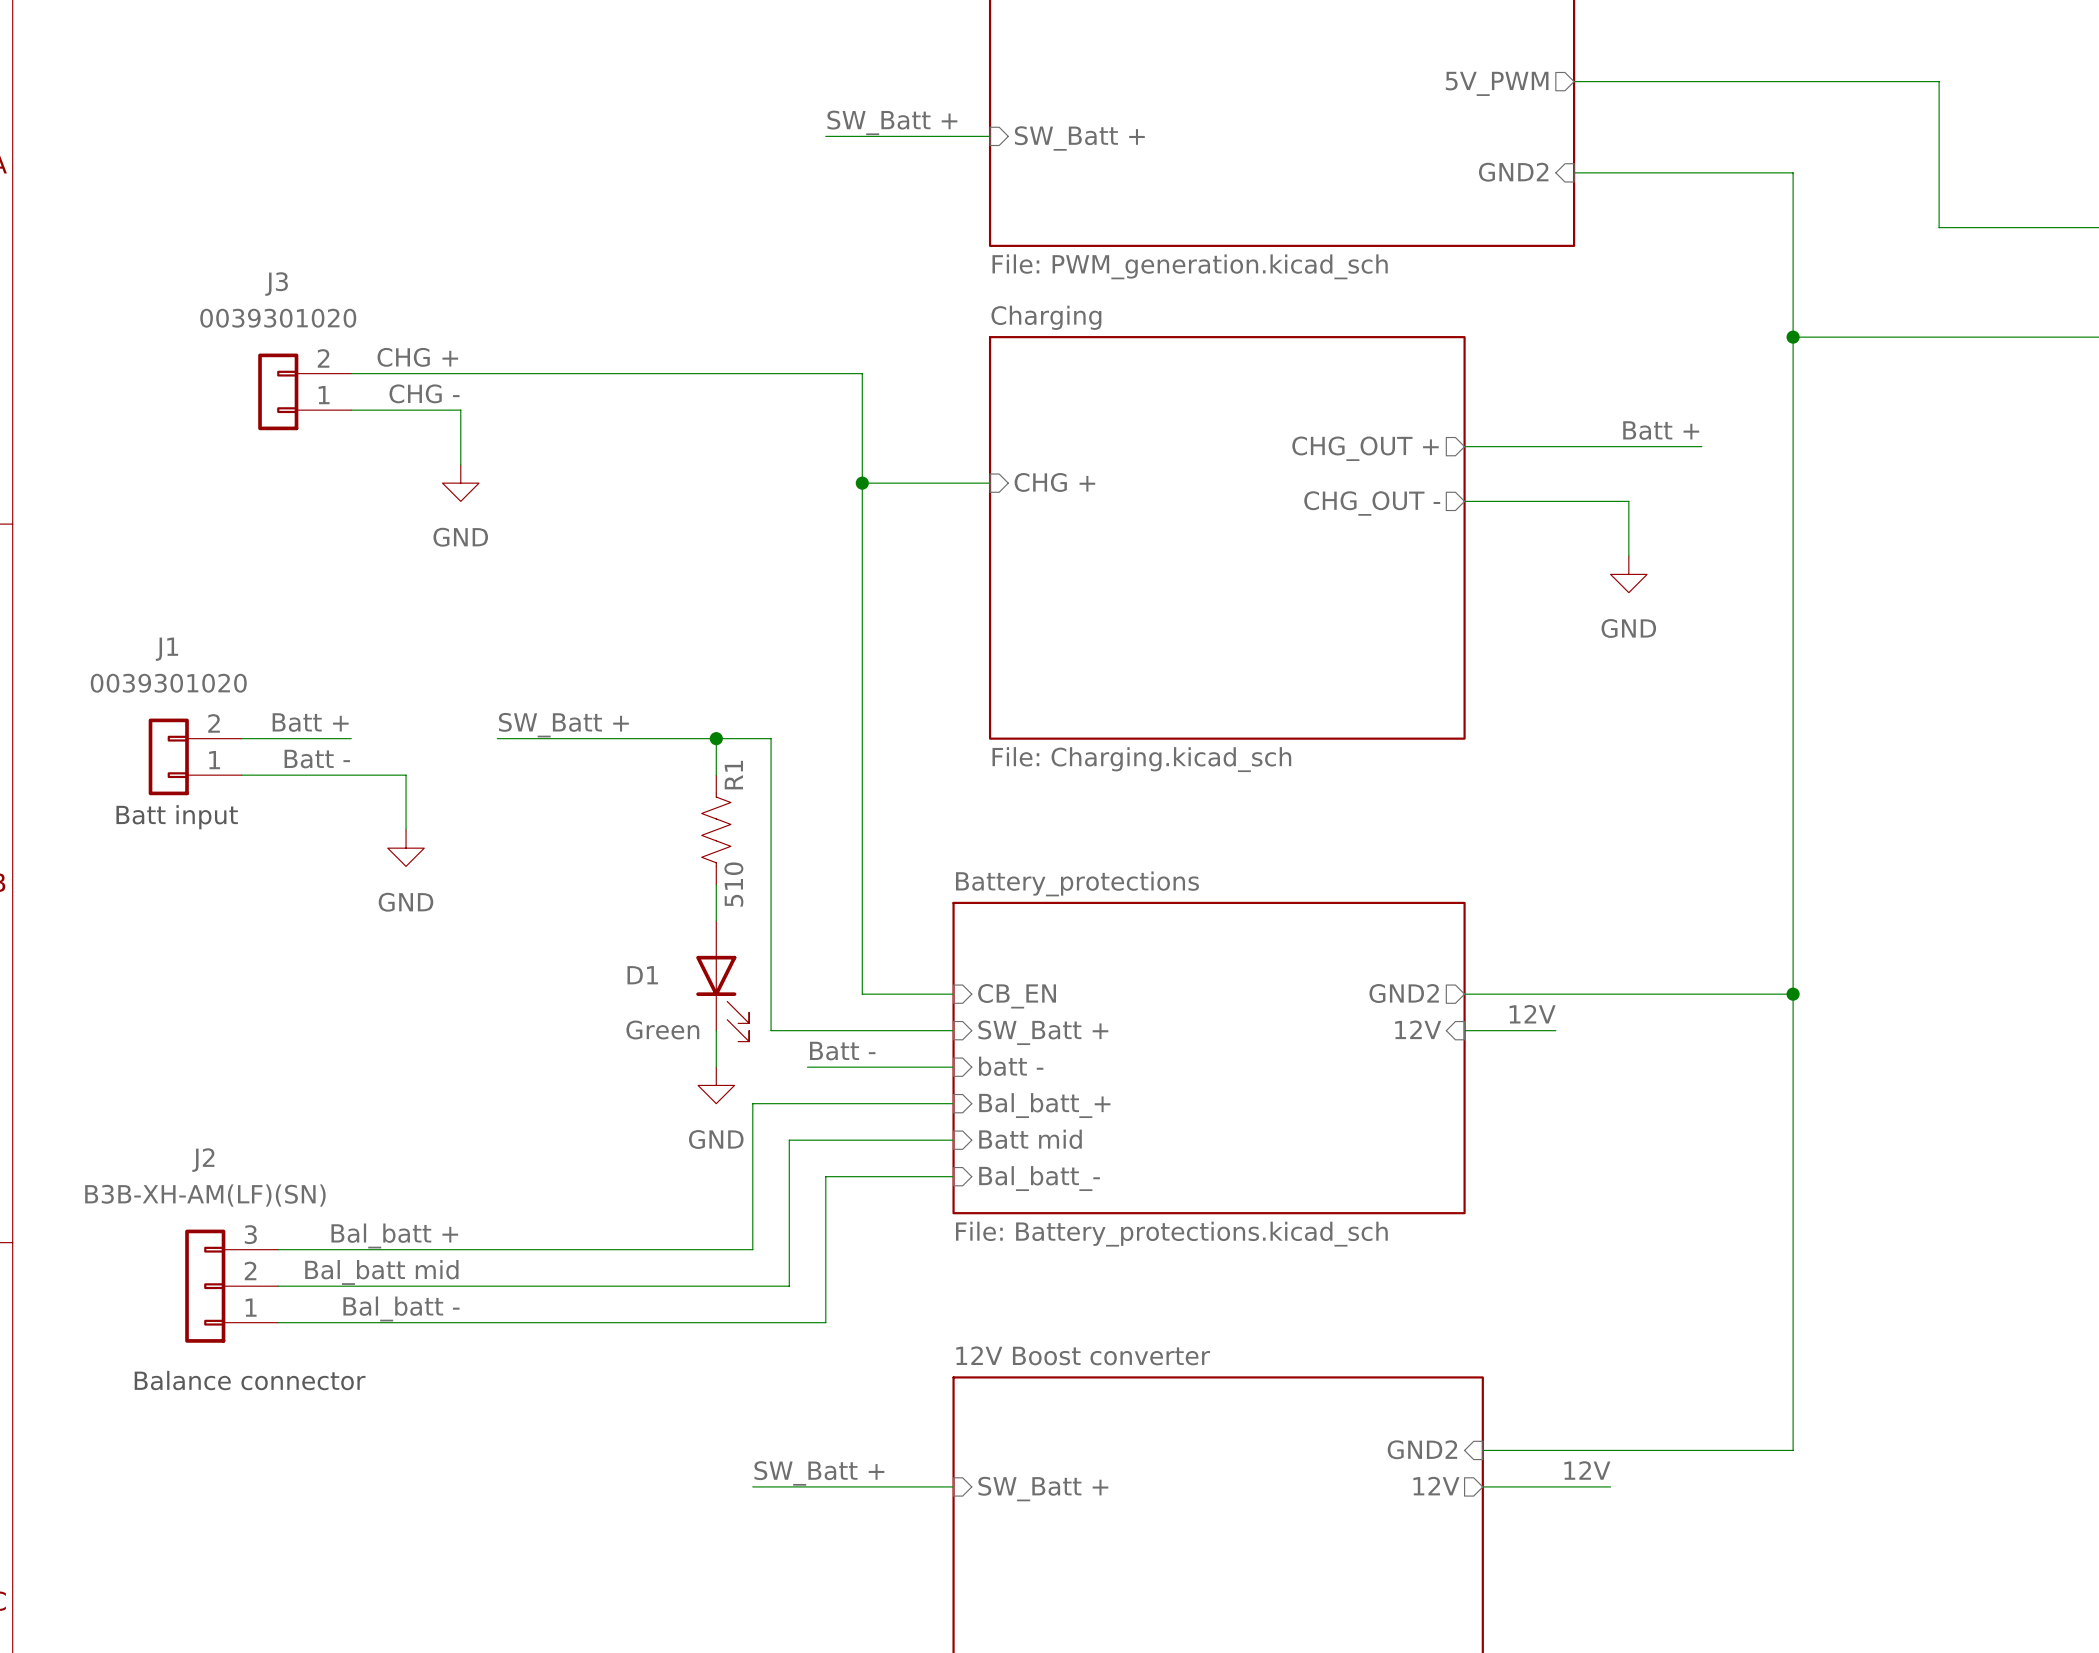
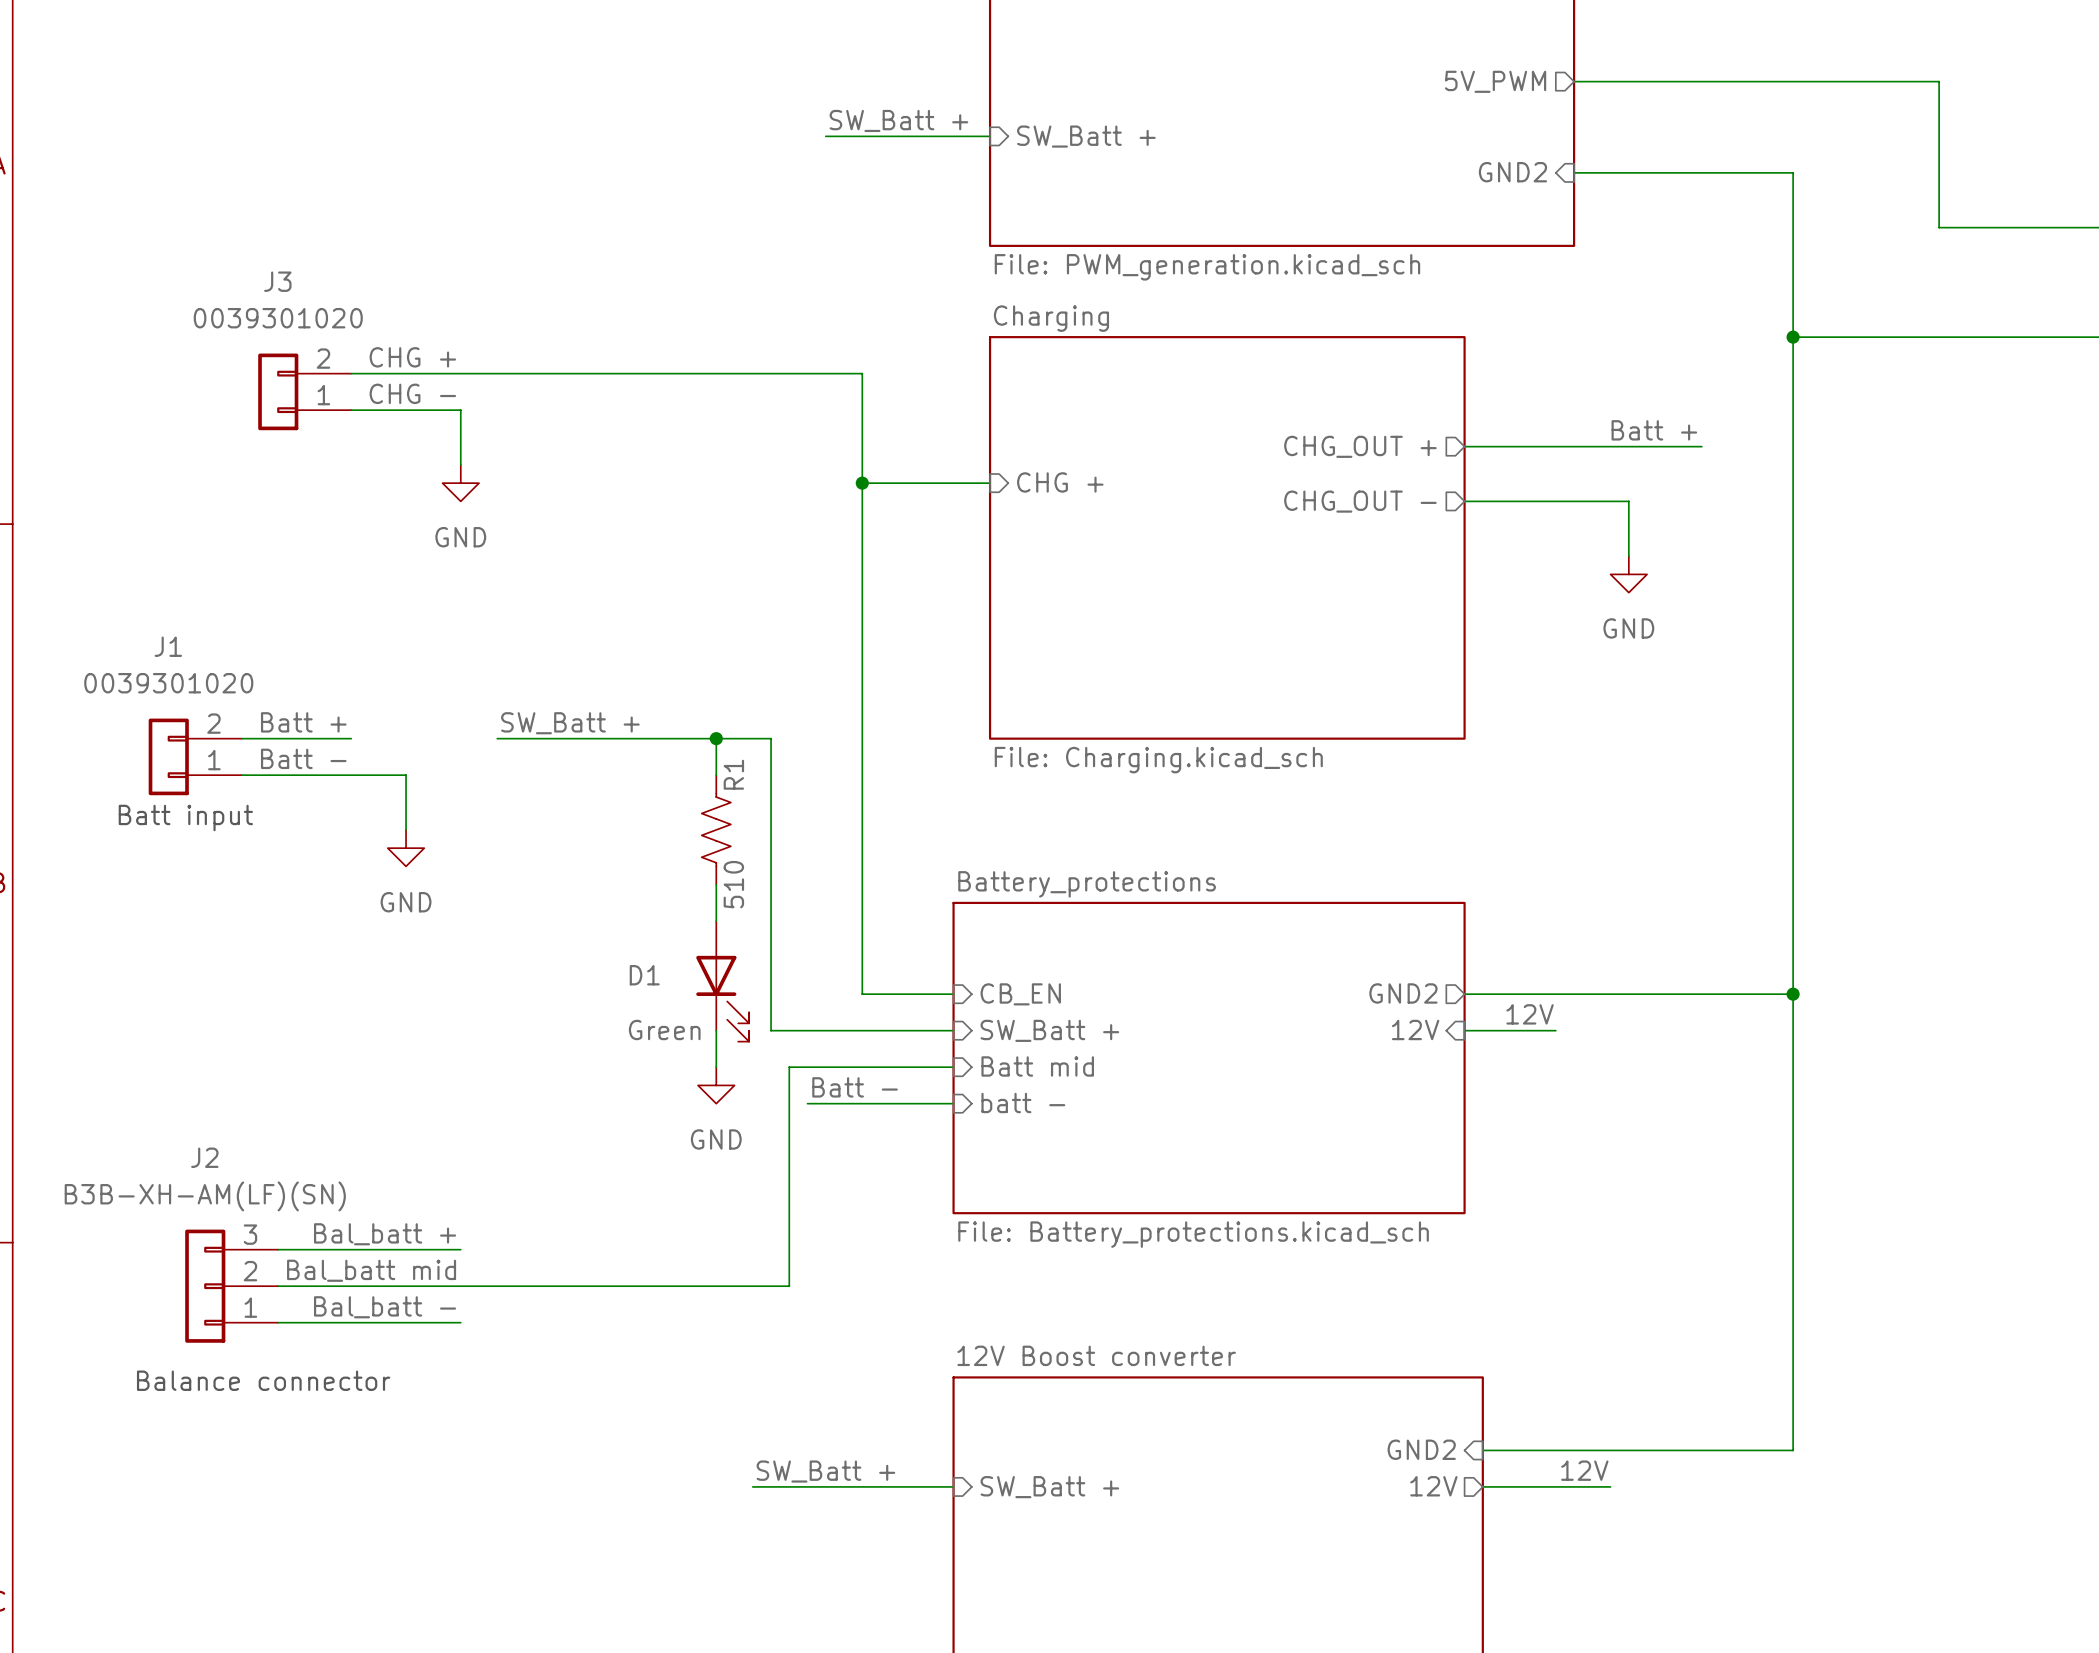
label position: Batt - (842, 1051) -> Batt - (855, 1087)
sheet pin: batt - (1011, 1066) -> Batt mid (1037, 1066)
wire: (807, 1103) (752, 1103) (752, 1249) (460, 1249) -> none
sheet pin: Bal_batt_+ (1044, 1105) -> batt - (1023, 1102)
sheet pin: Batt mid (1030, 1139) -> none
wire: (789, 1140) (953, 1140) -> (789, 1140) (789, 1067) (807, 1067)
wire: (953, 1176) (825, 1176) (825, 1322) (460, 1322) -> none
sheet pin: Bal_batt_- (1039, 1178) -> none

